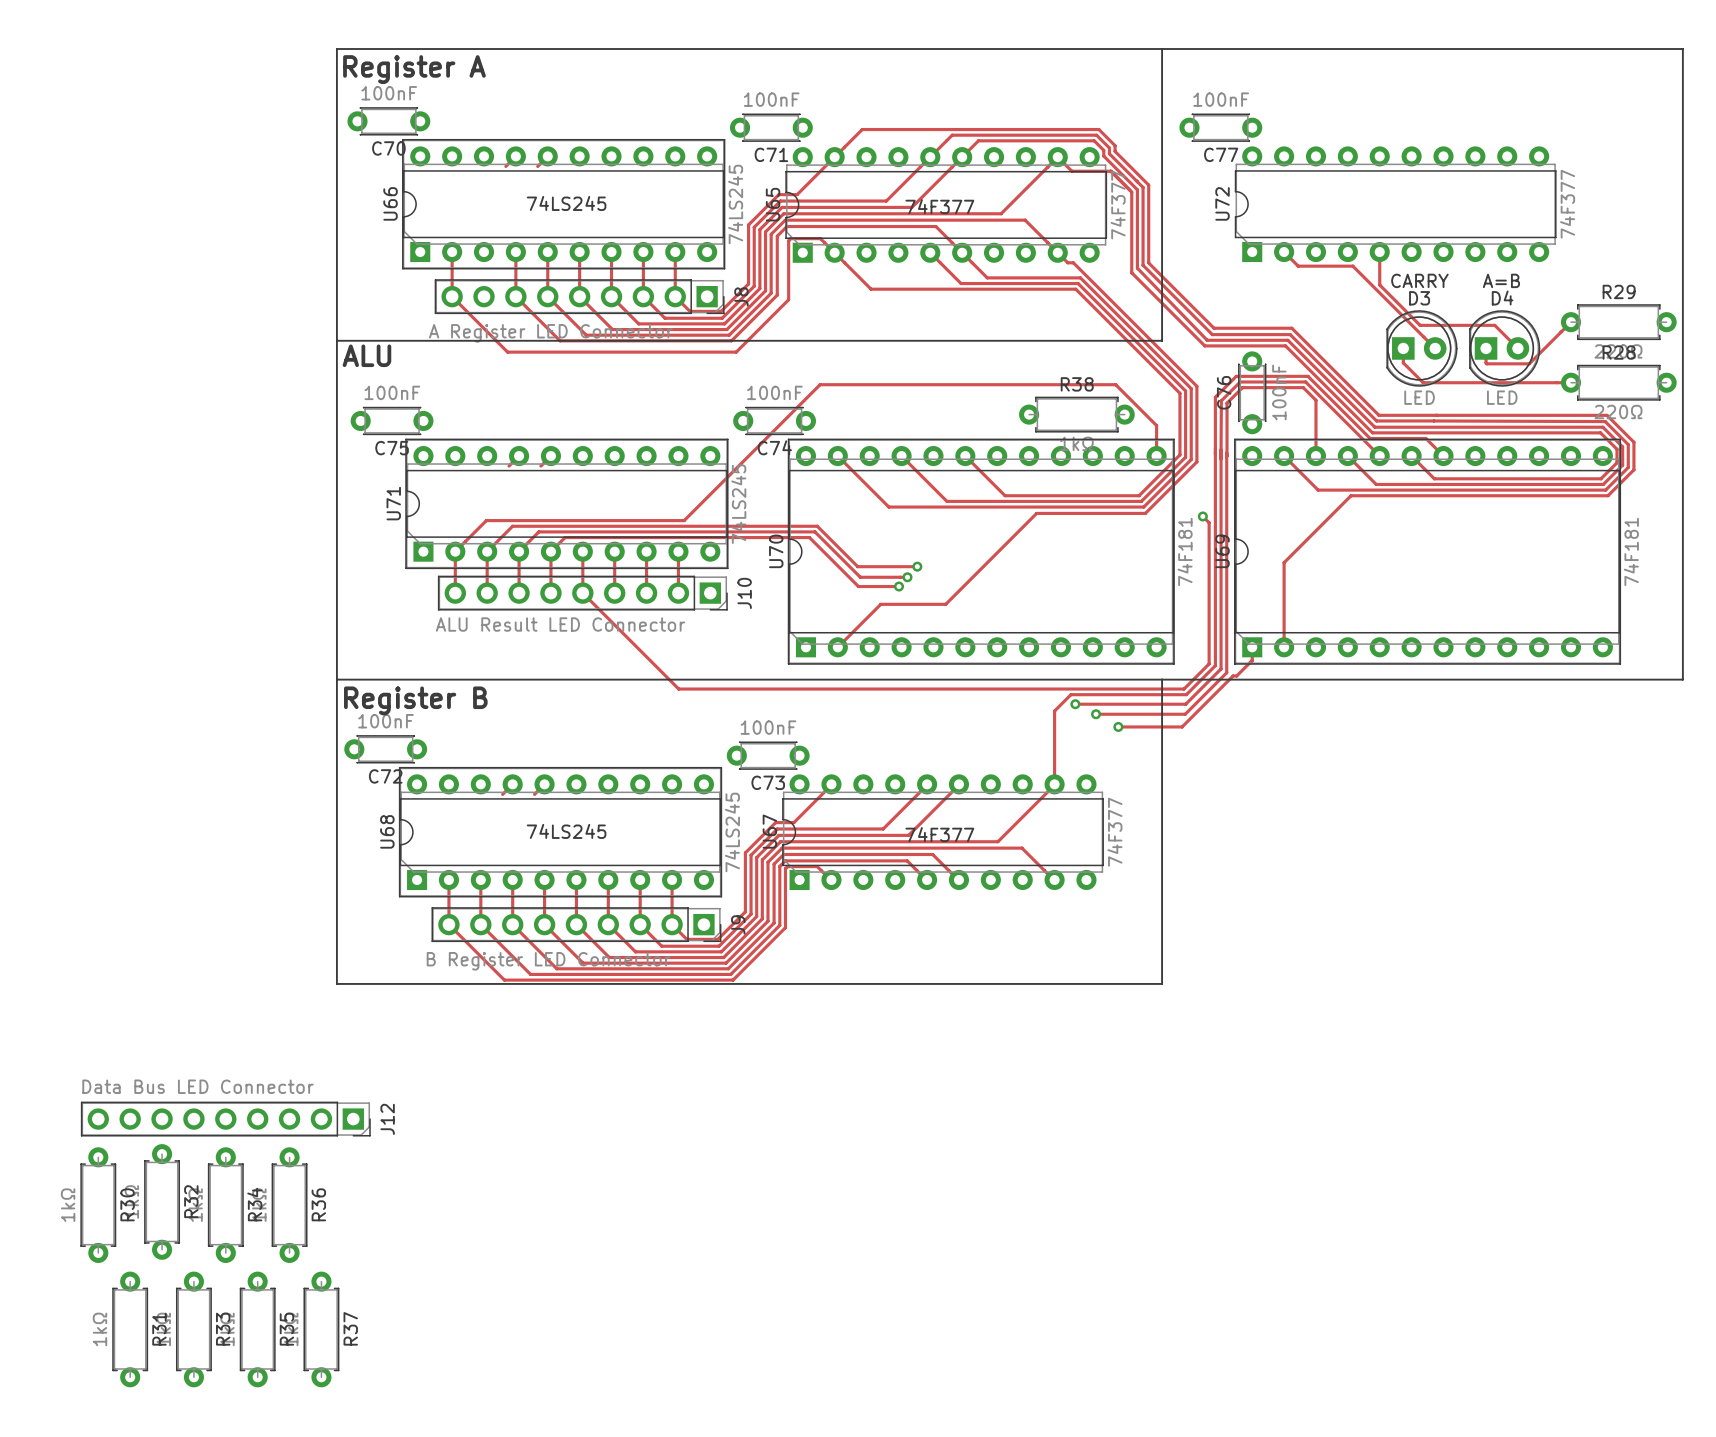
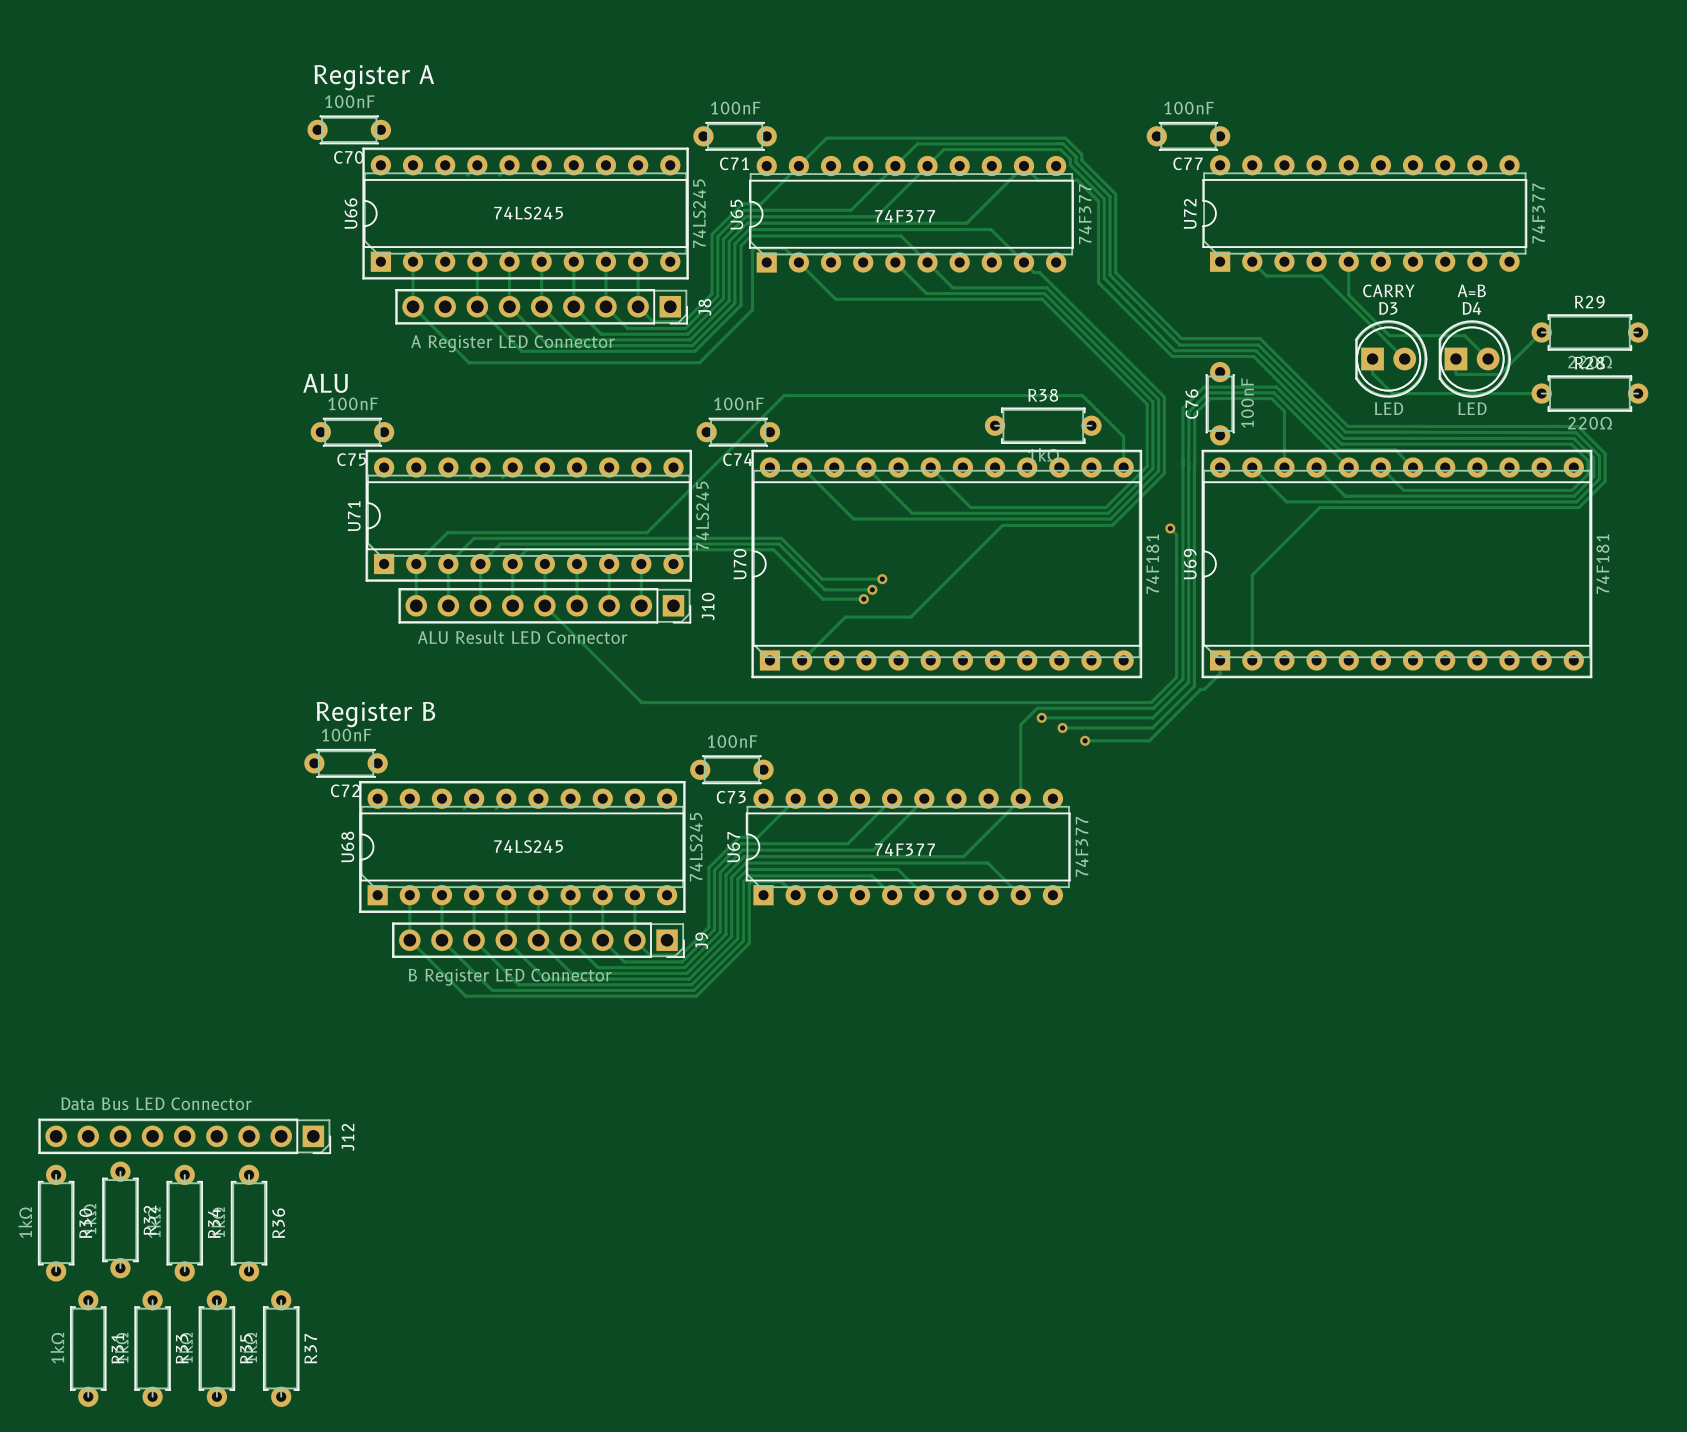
line: (1162, 49) (1162, 340) (336, 340) -> none
text position: ALU (366, 355) -> ALU (325, 383)
line: (336, 679) (1682, 679) (1682, 49) (336, 49) (336, 983) (1162, 983) (1162, 679) -> none

